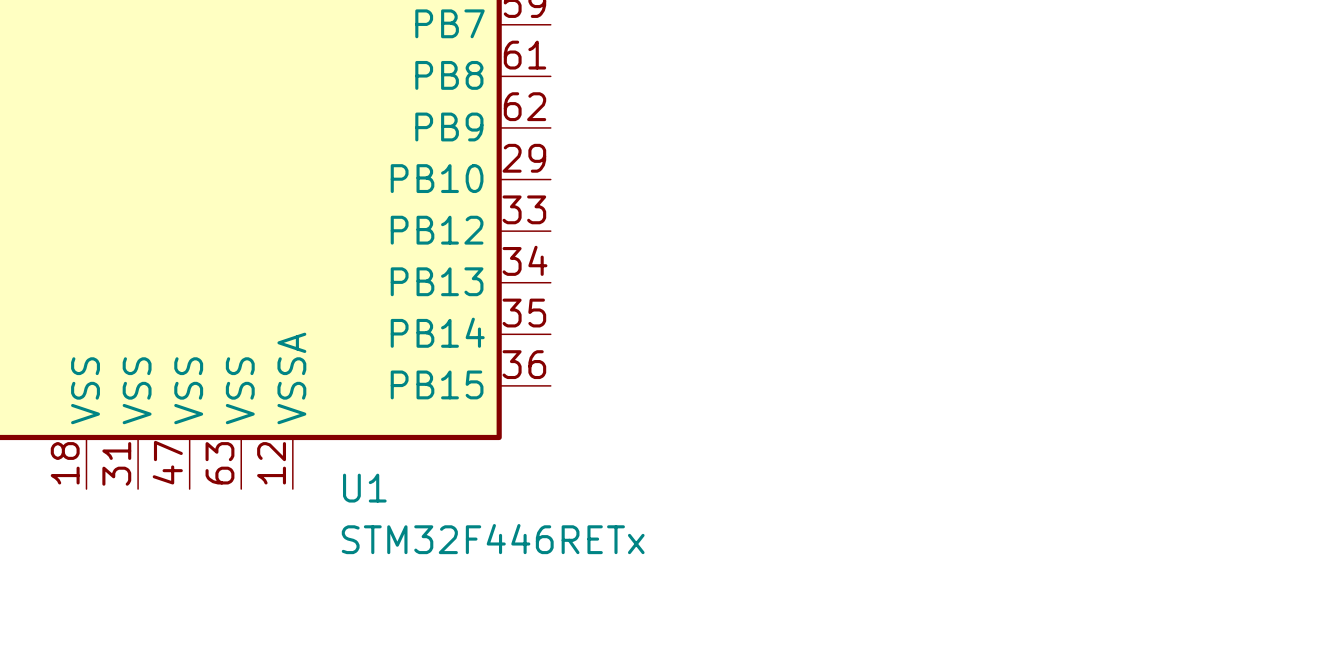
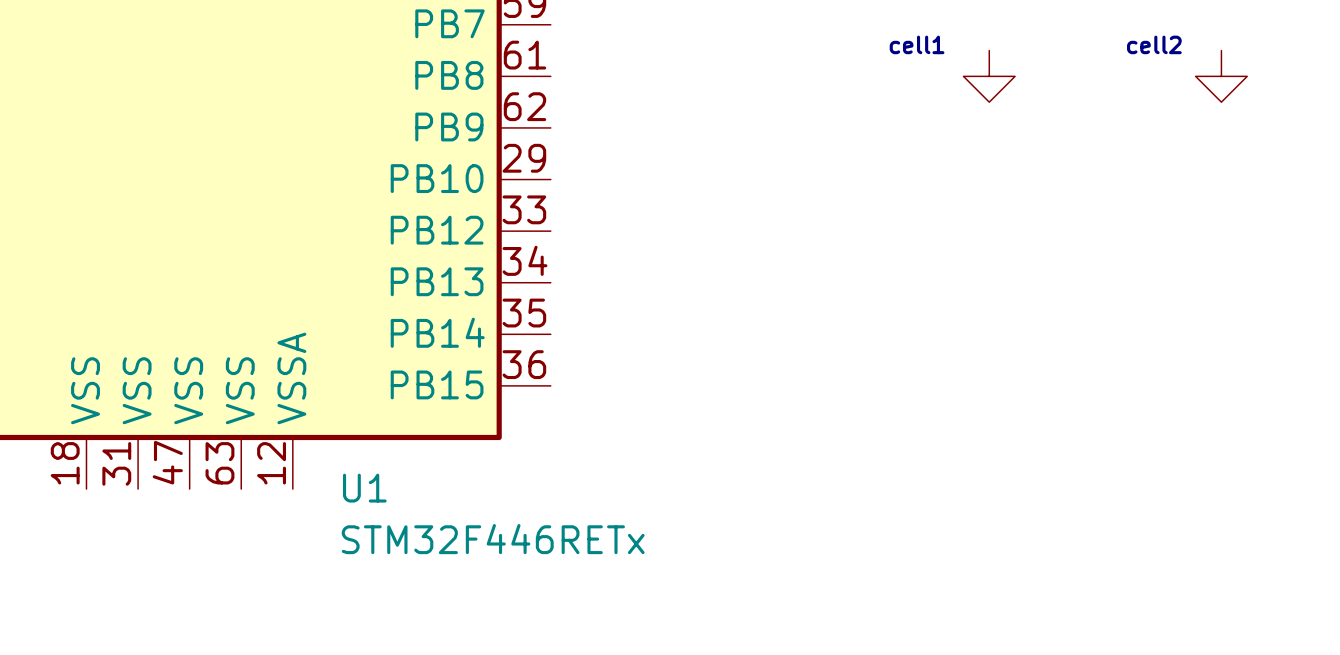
text: none -> cell1 (917, 44)
text: none -> cell2 (1154, 44)
power symbol: none -> (989, 76)
power symbol: none -> (1221, 76)

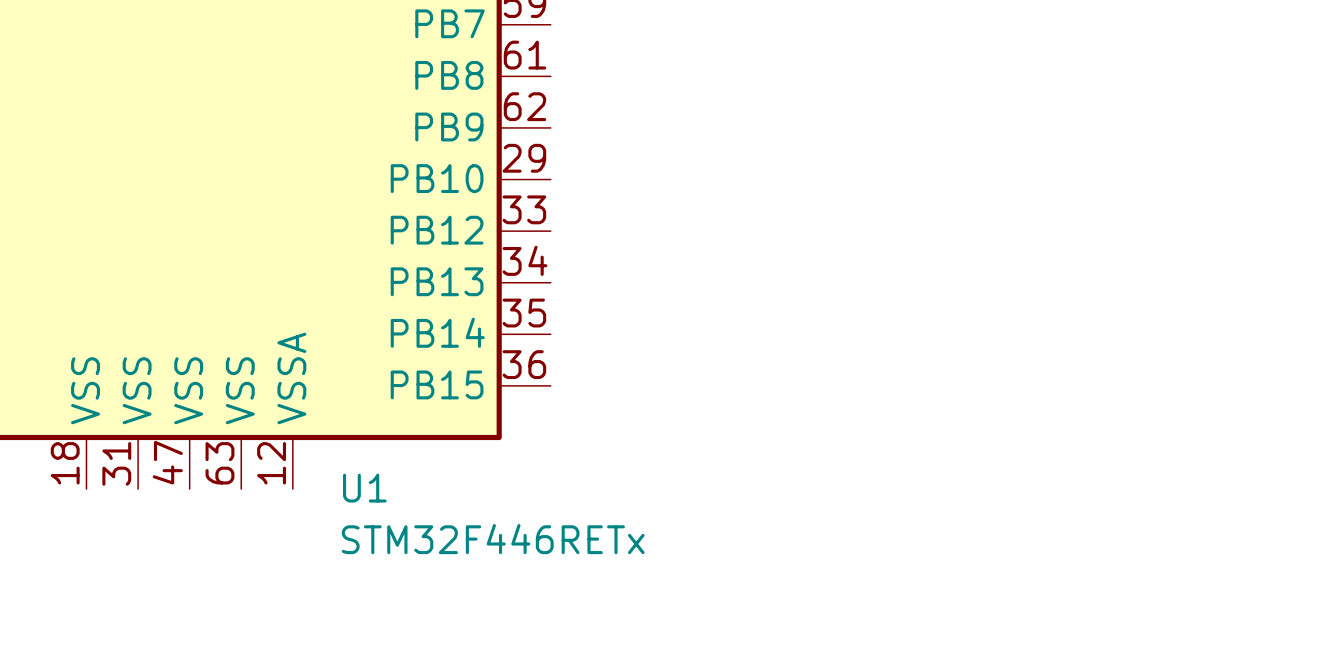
text: cell1 (917, 44) -> none
text: cell2 (1154, 44) -> none
power symbol: (989, 76) -> none
power symbol: (1221, 76) -> none

